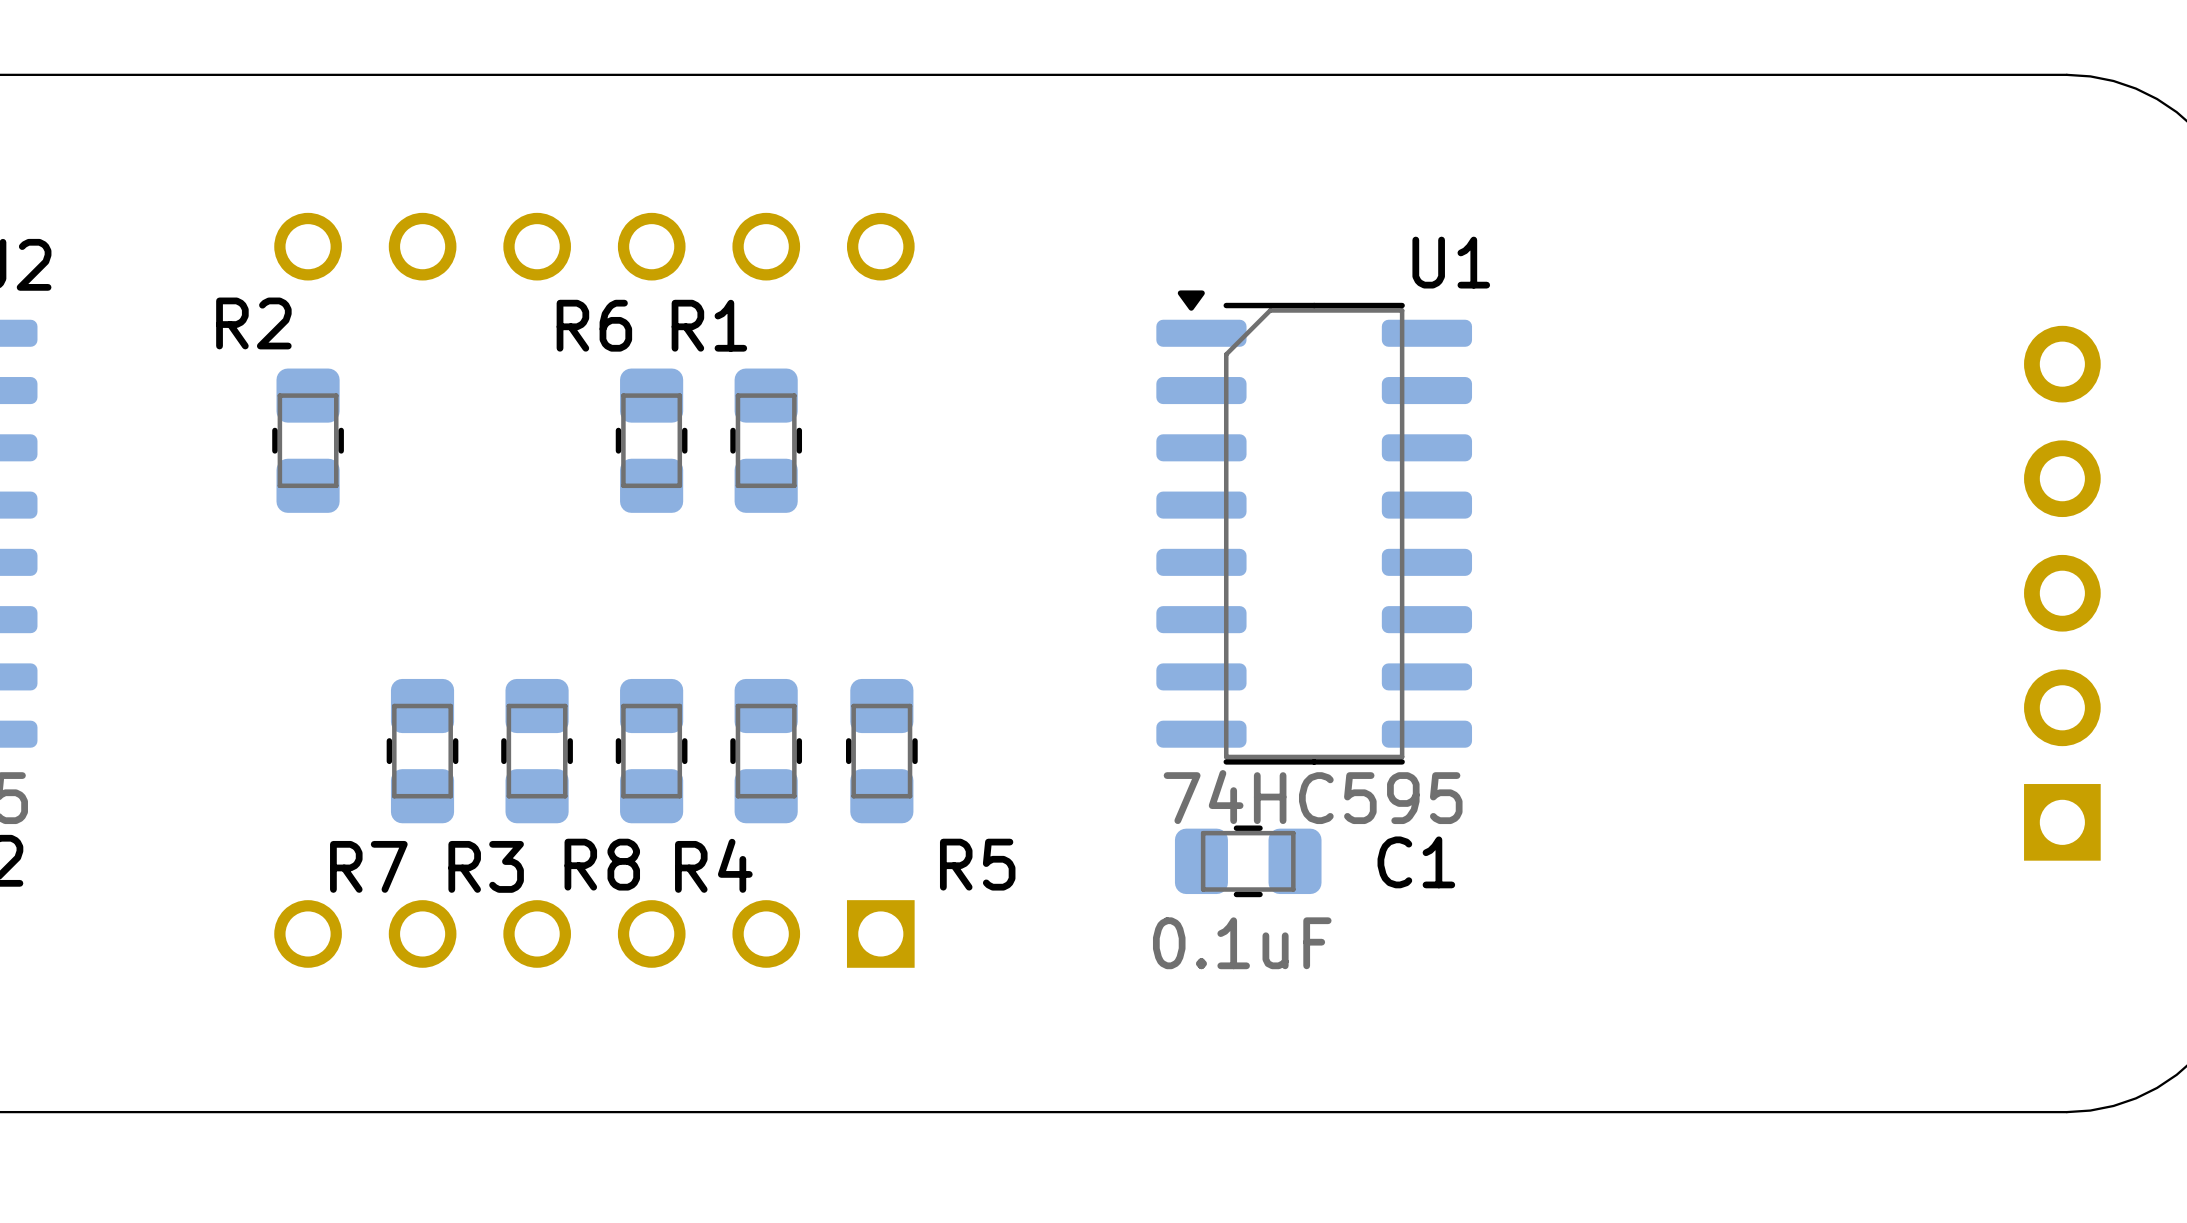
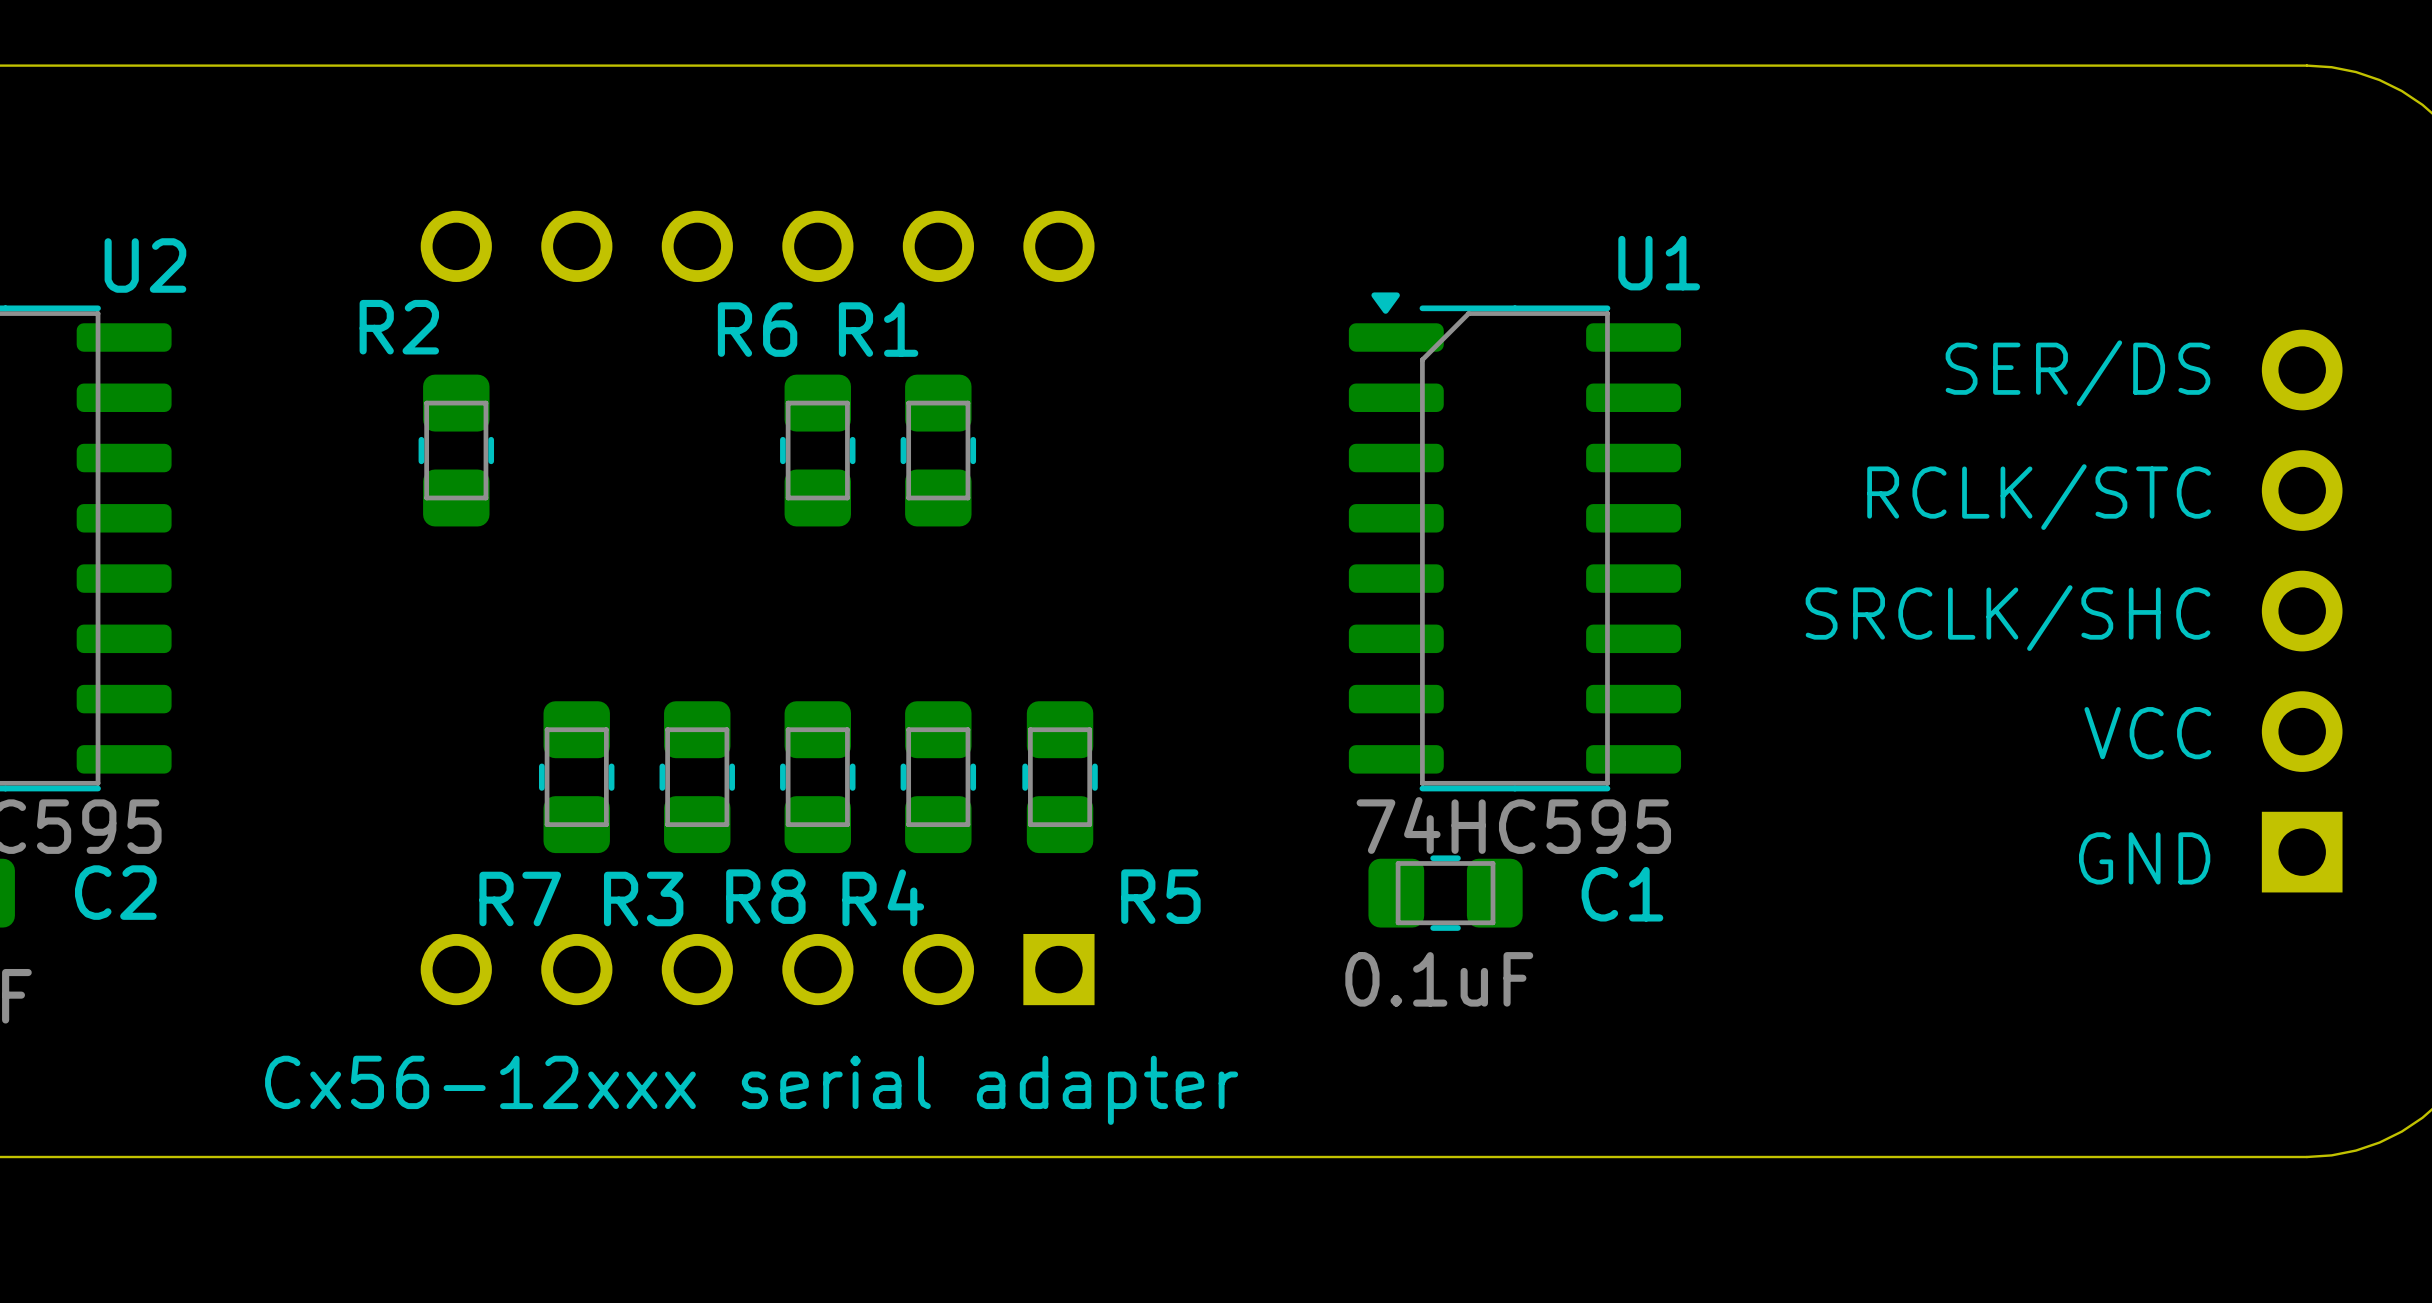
text: none -> SER/DS (2077, 373)
text: none -> RCLK/STC (2039, 497)
text: none -> SRCLK/SHC (2008, 618)
text: none -> VCC (2147, 733)
text: none -> GND (2144, 858)
text: none -> Cx56-12xxx serial adapter (751, 1090)

